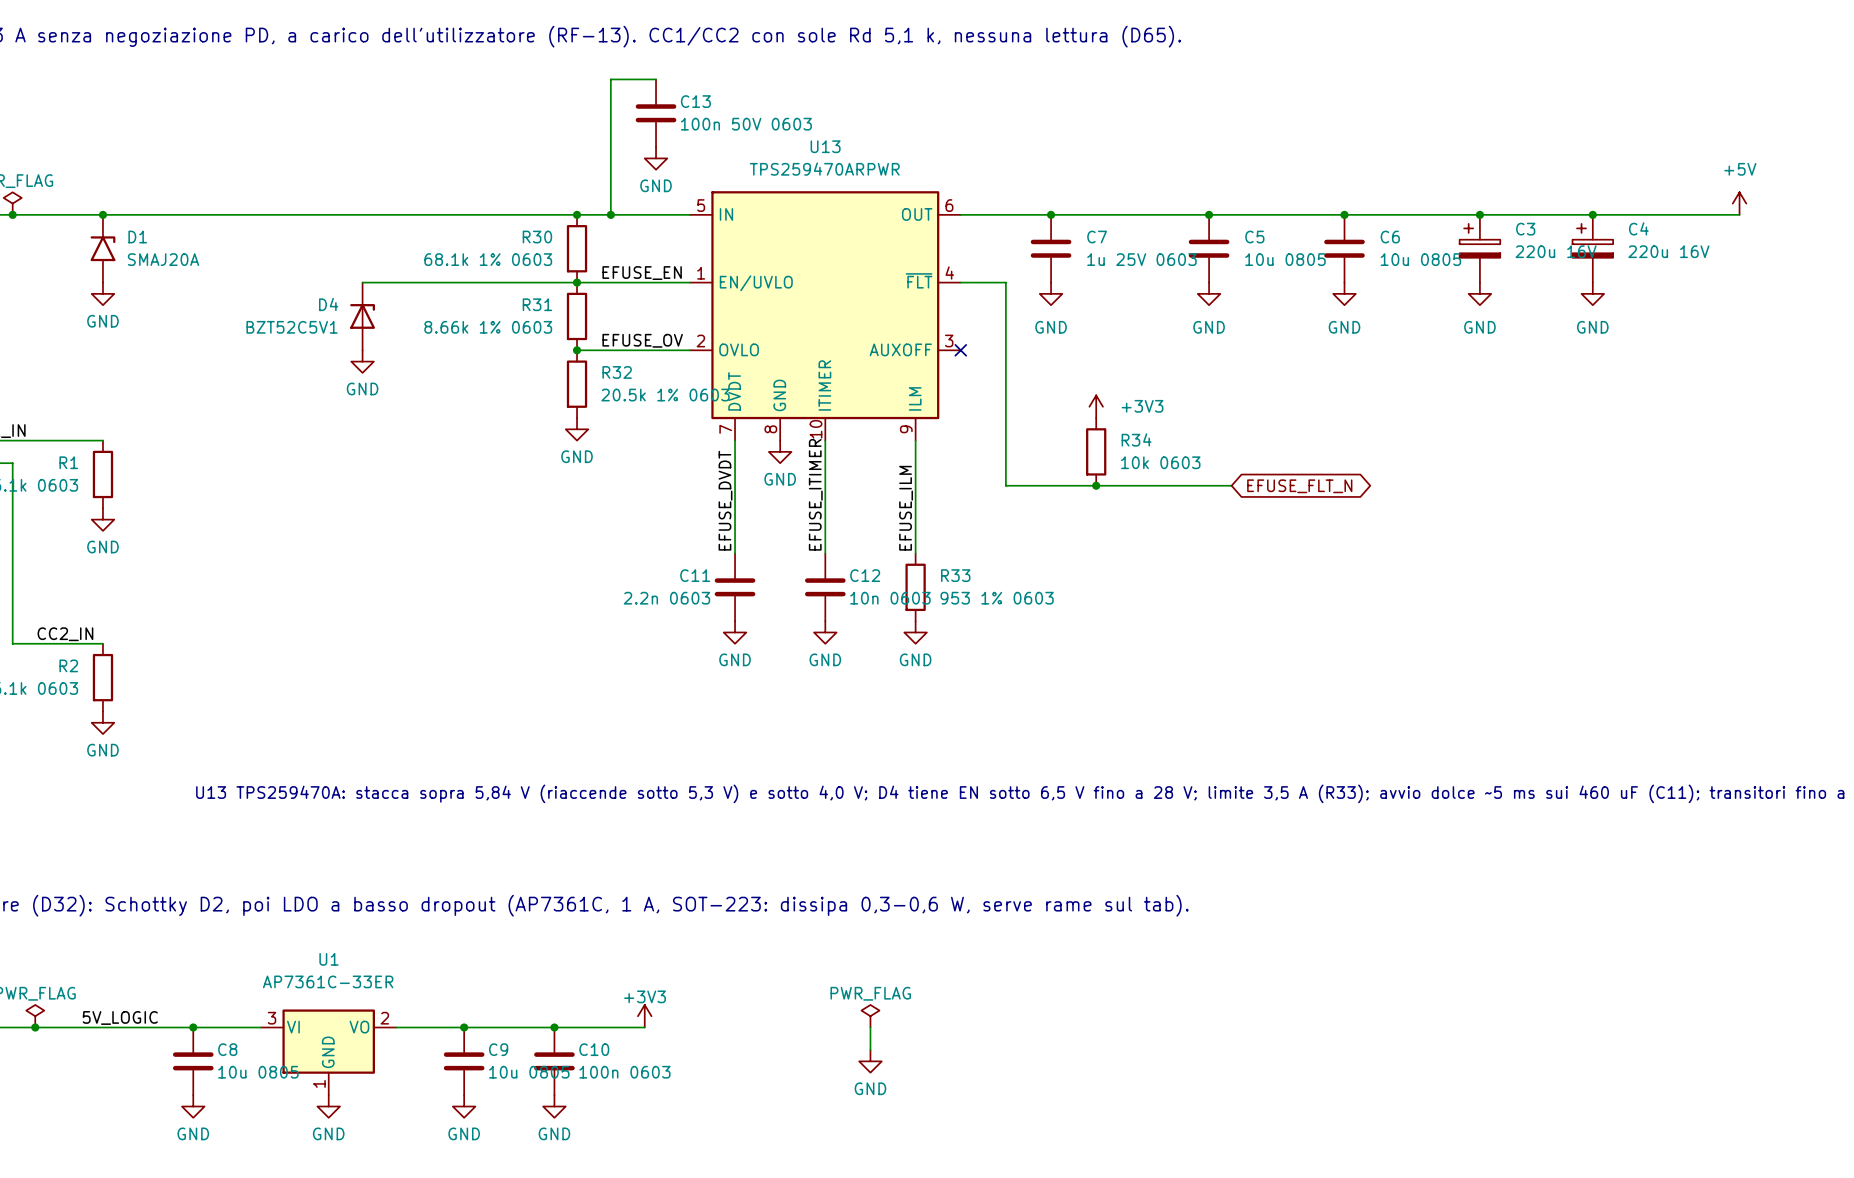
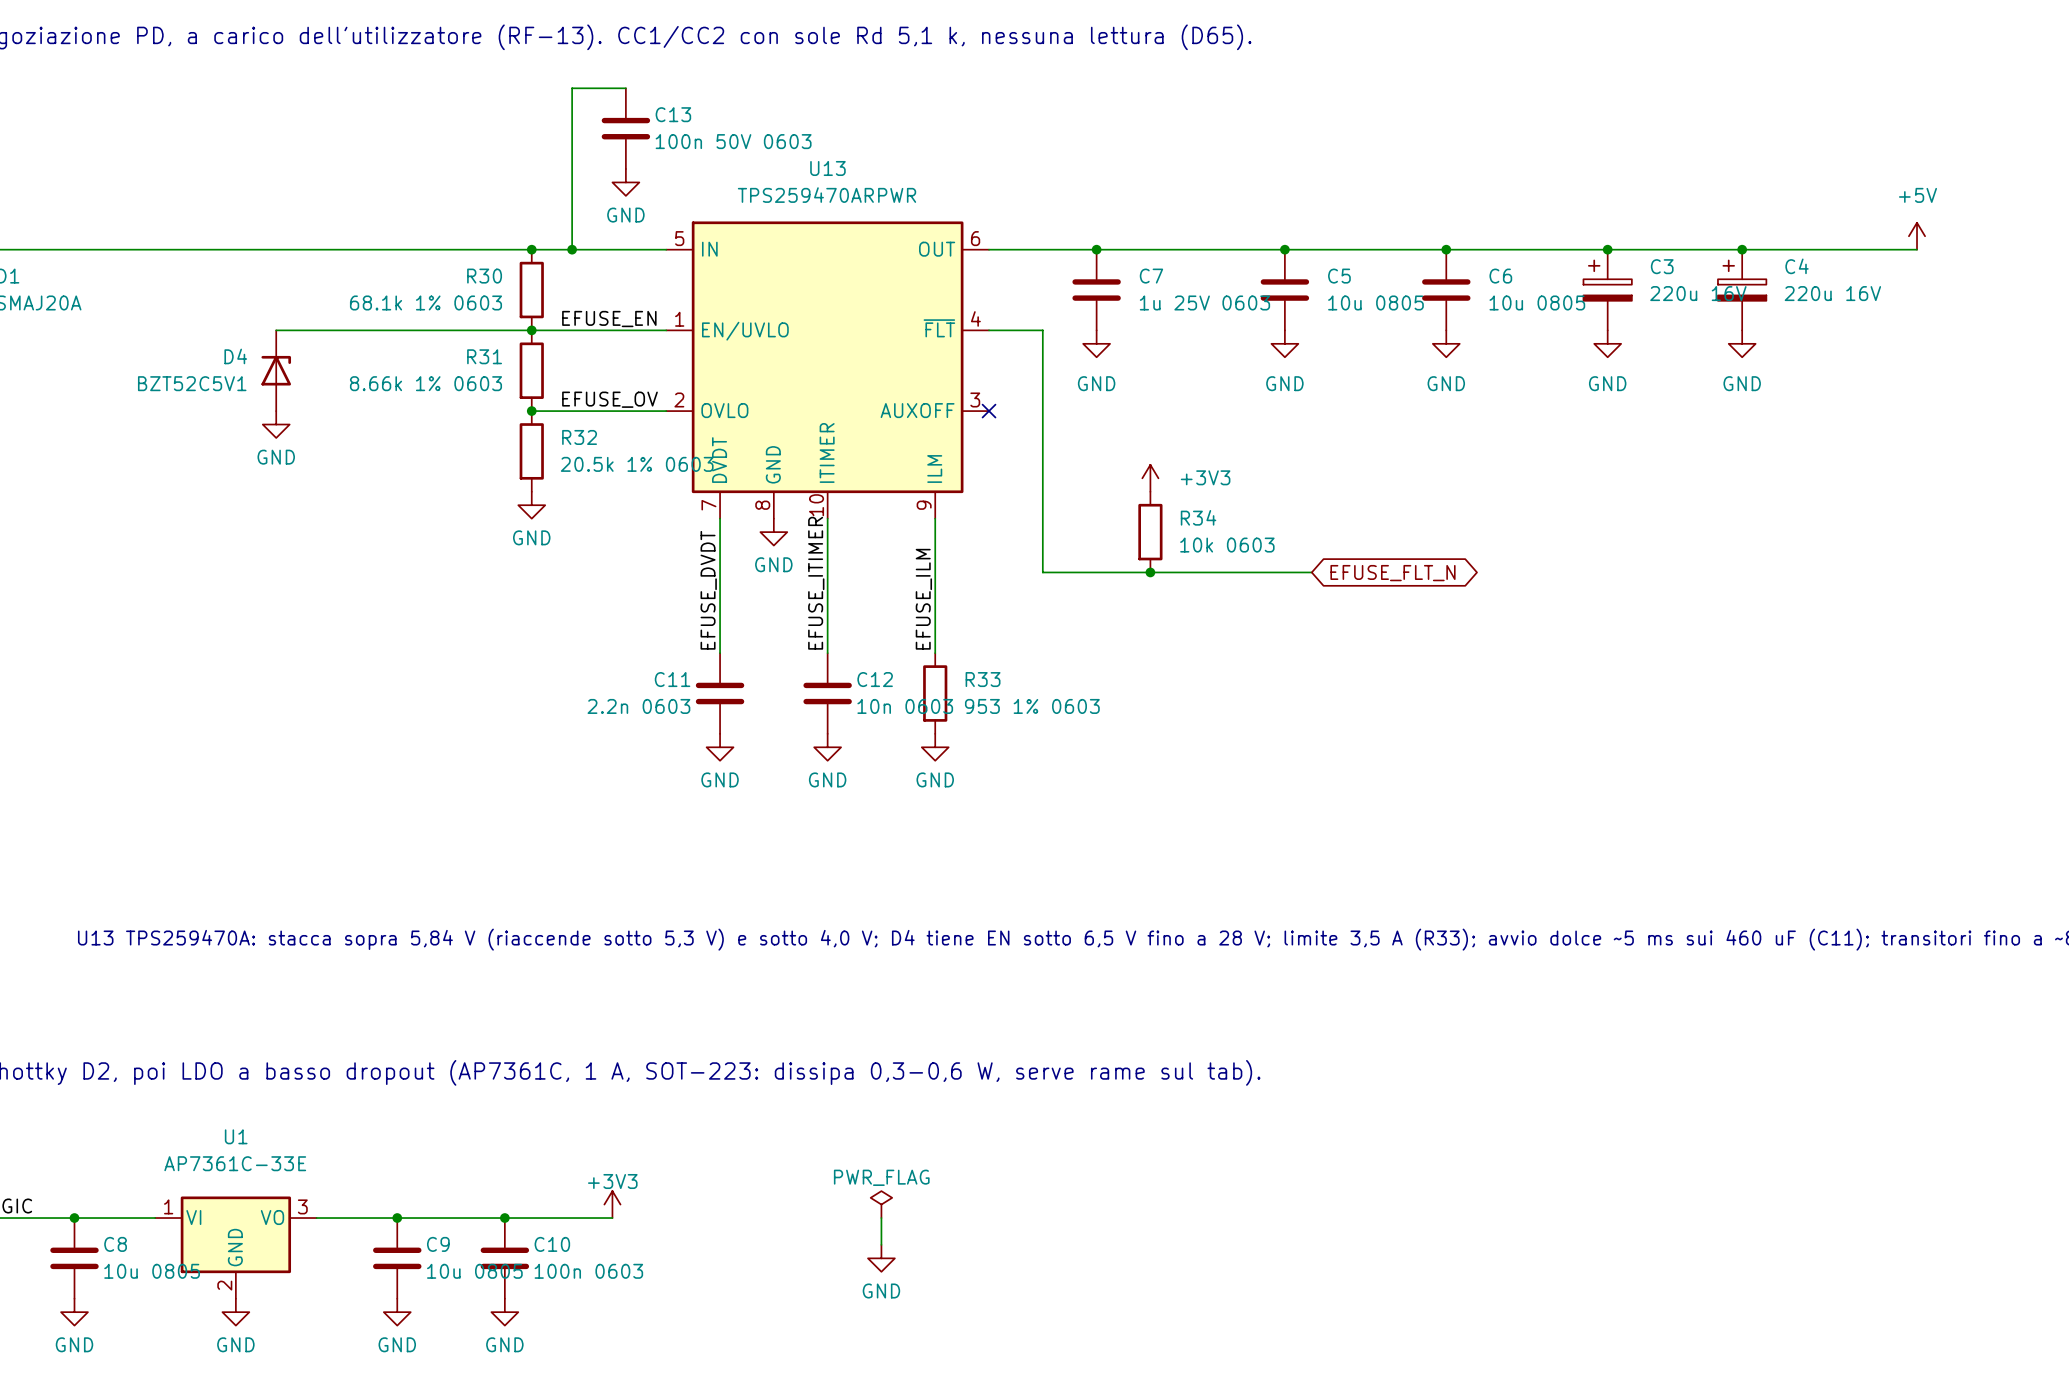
U1 value: AP7361C-33ER (328, 981) -> AP7361C-33E (235, 1163)
U1 pin number: 3 (272, 1018) -> 1 (168, 1206)
U1 pin number: 2 (384, 1018) -> 3 (302, 1206)
U1 pin number: 1 (319, 1083) -> 2 (224, 1285)

